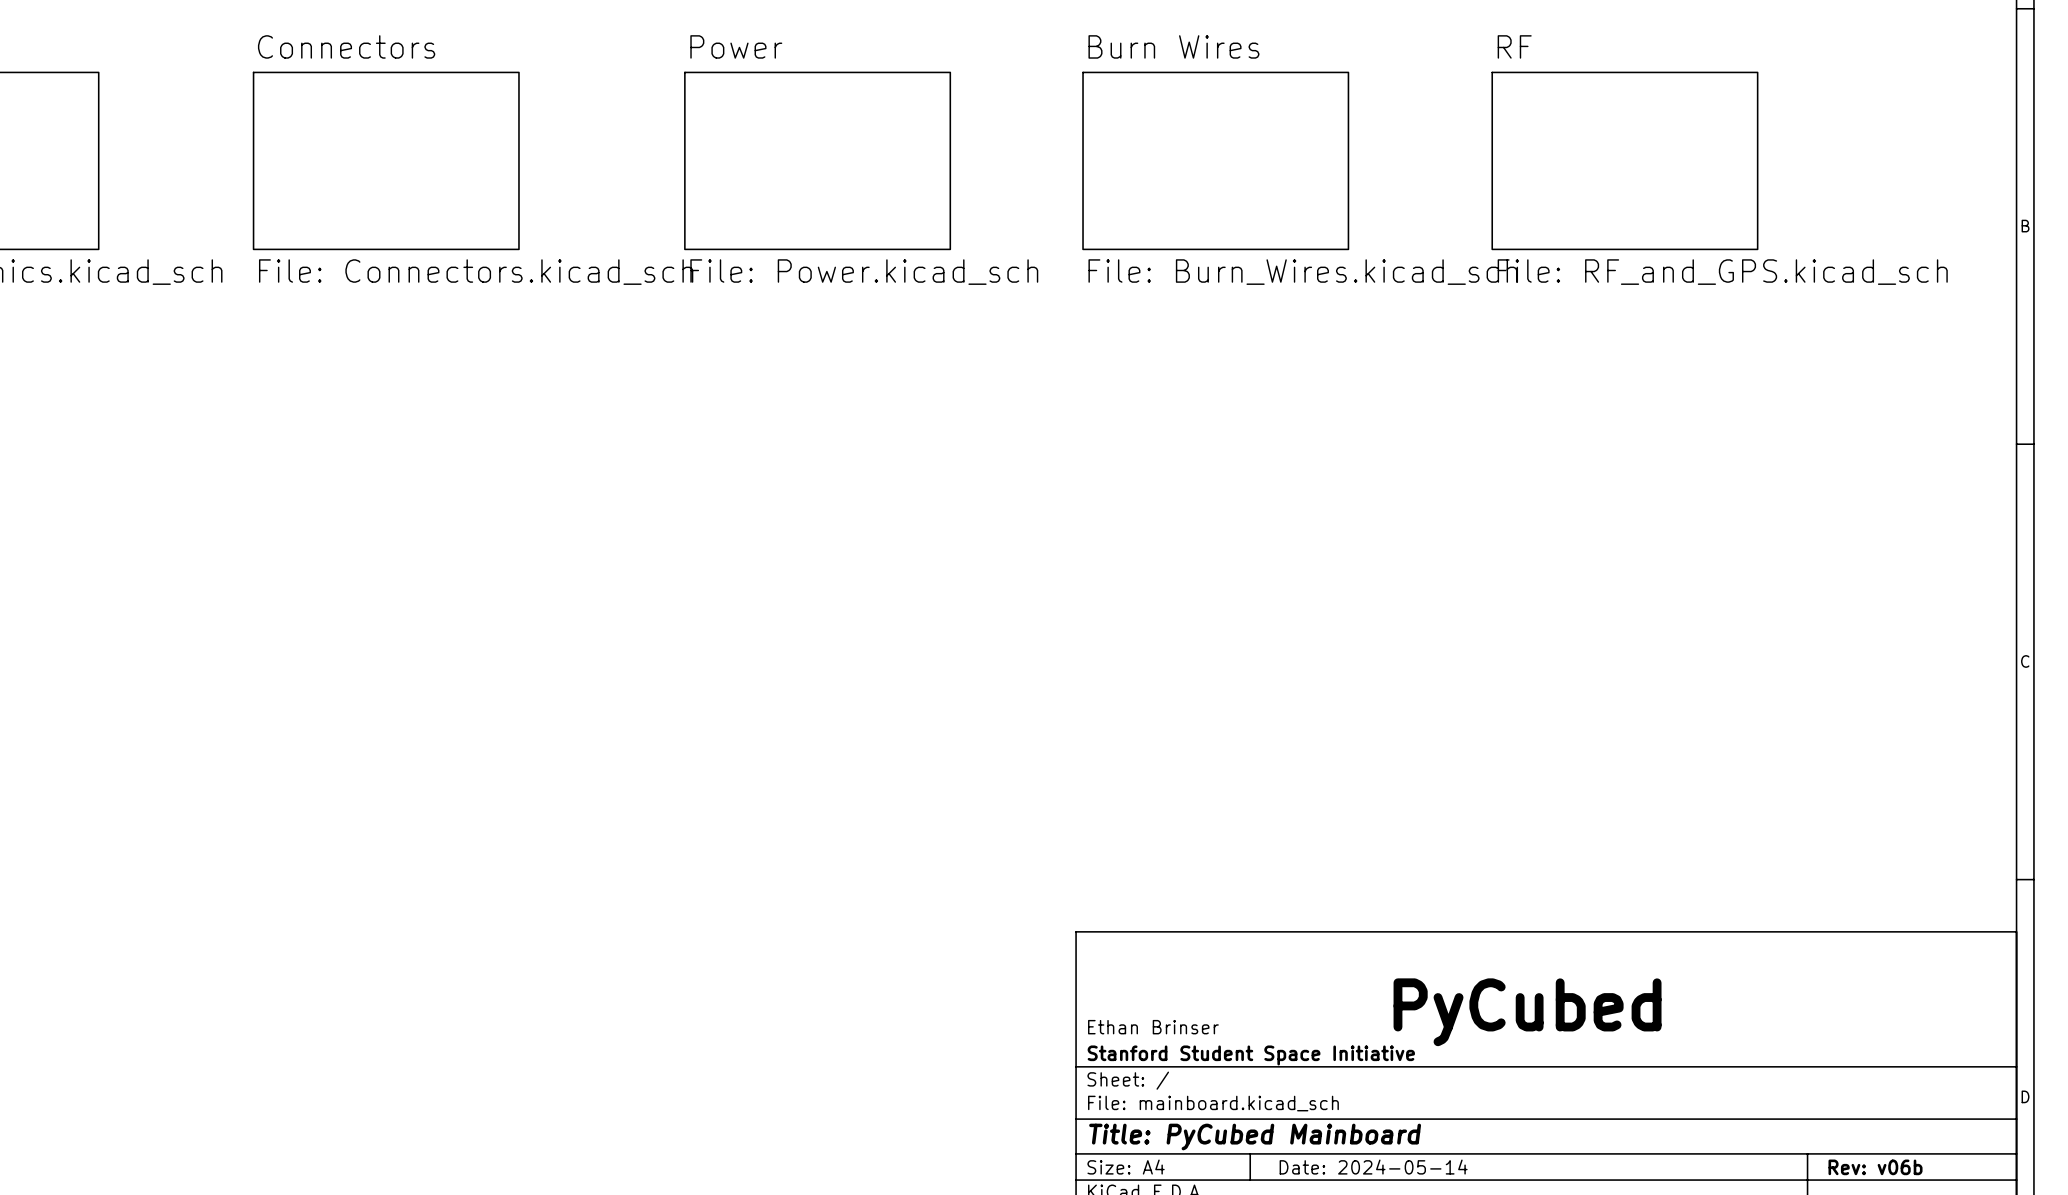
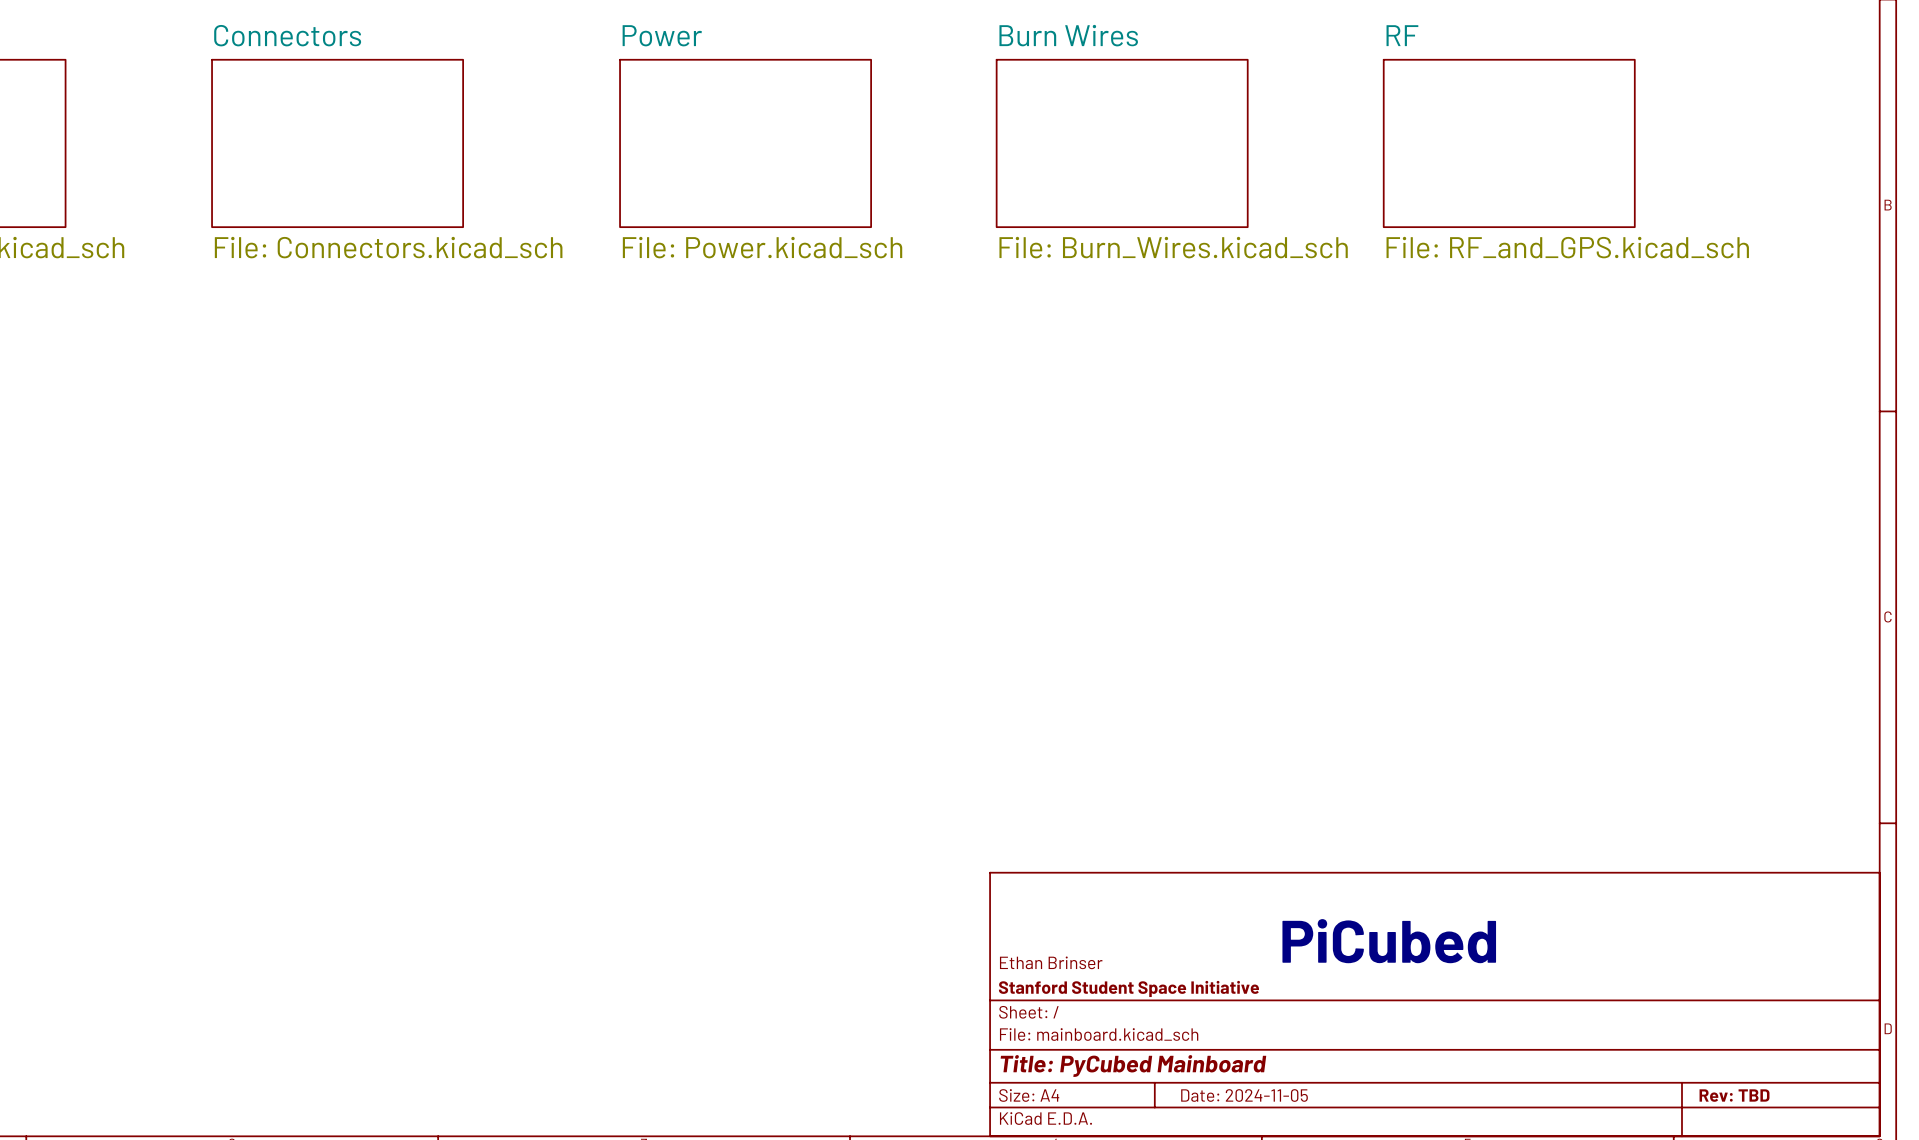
text: PyCubed (1527, 1012) -> PiCubed (1389, 941)
title block: Date: 2024-05-14 (1373, 1167) -> Date: 2024-11-05 (1244, 1095)
title block: Rev: v06b (1875, 1167) -> Rev: TBD (1734, 1095)

